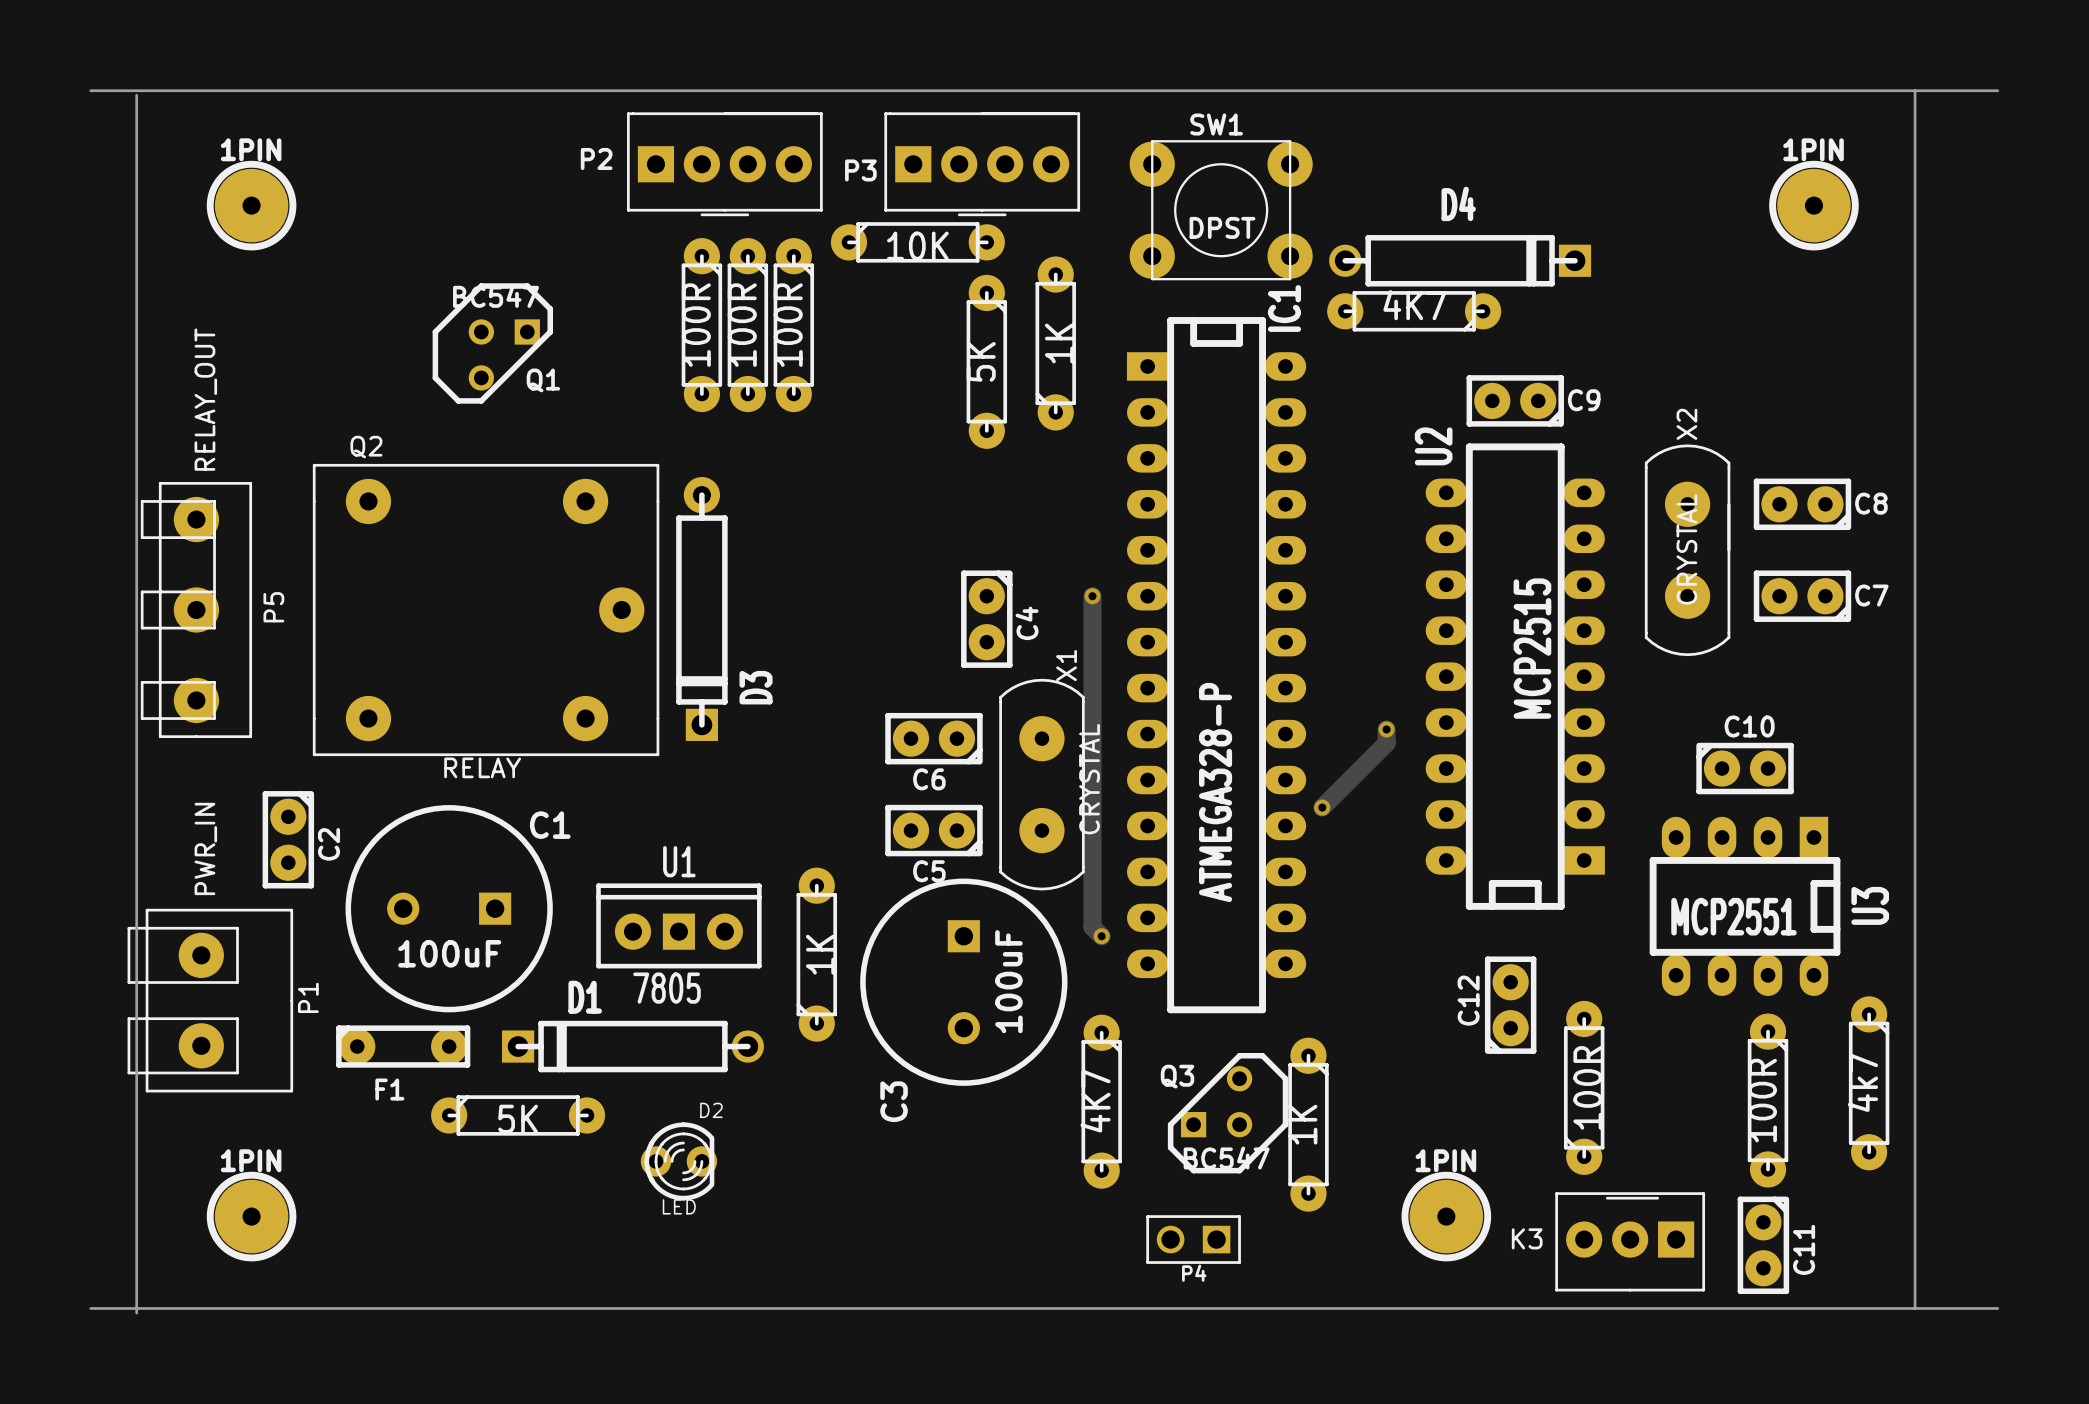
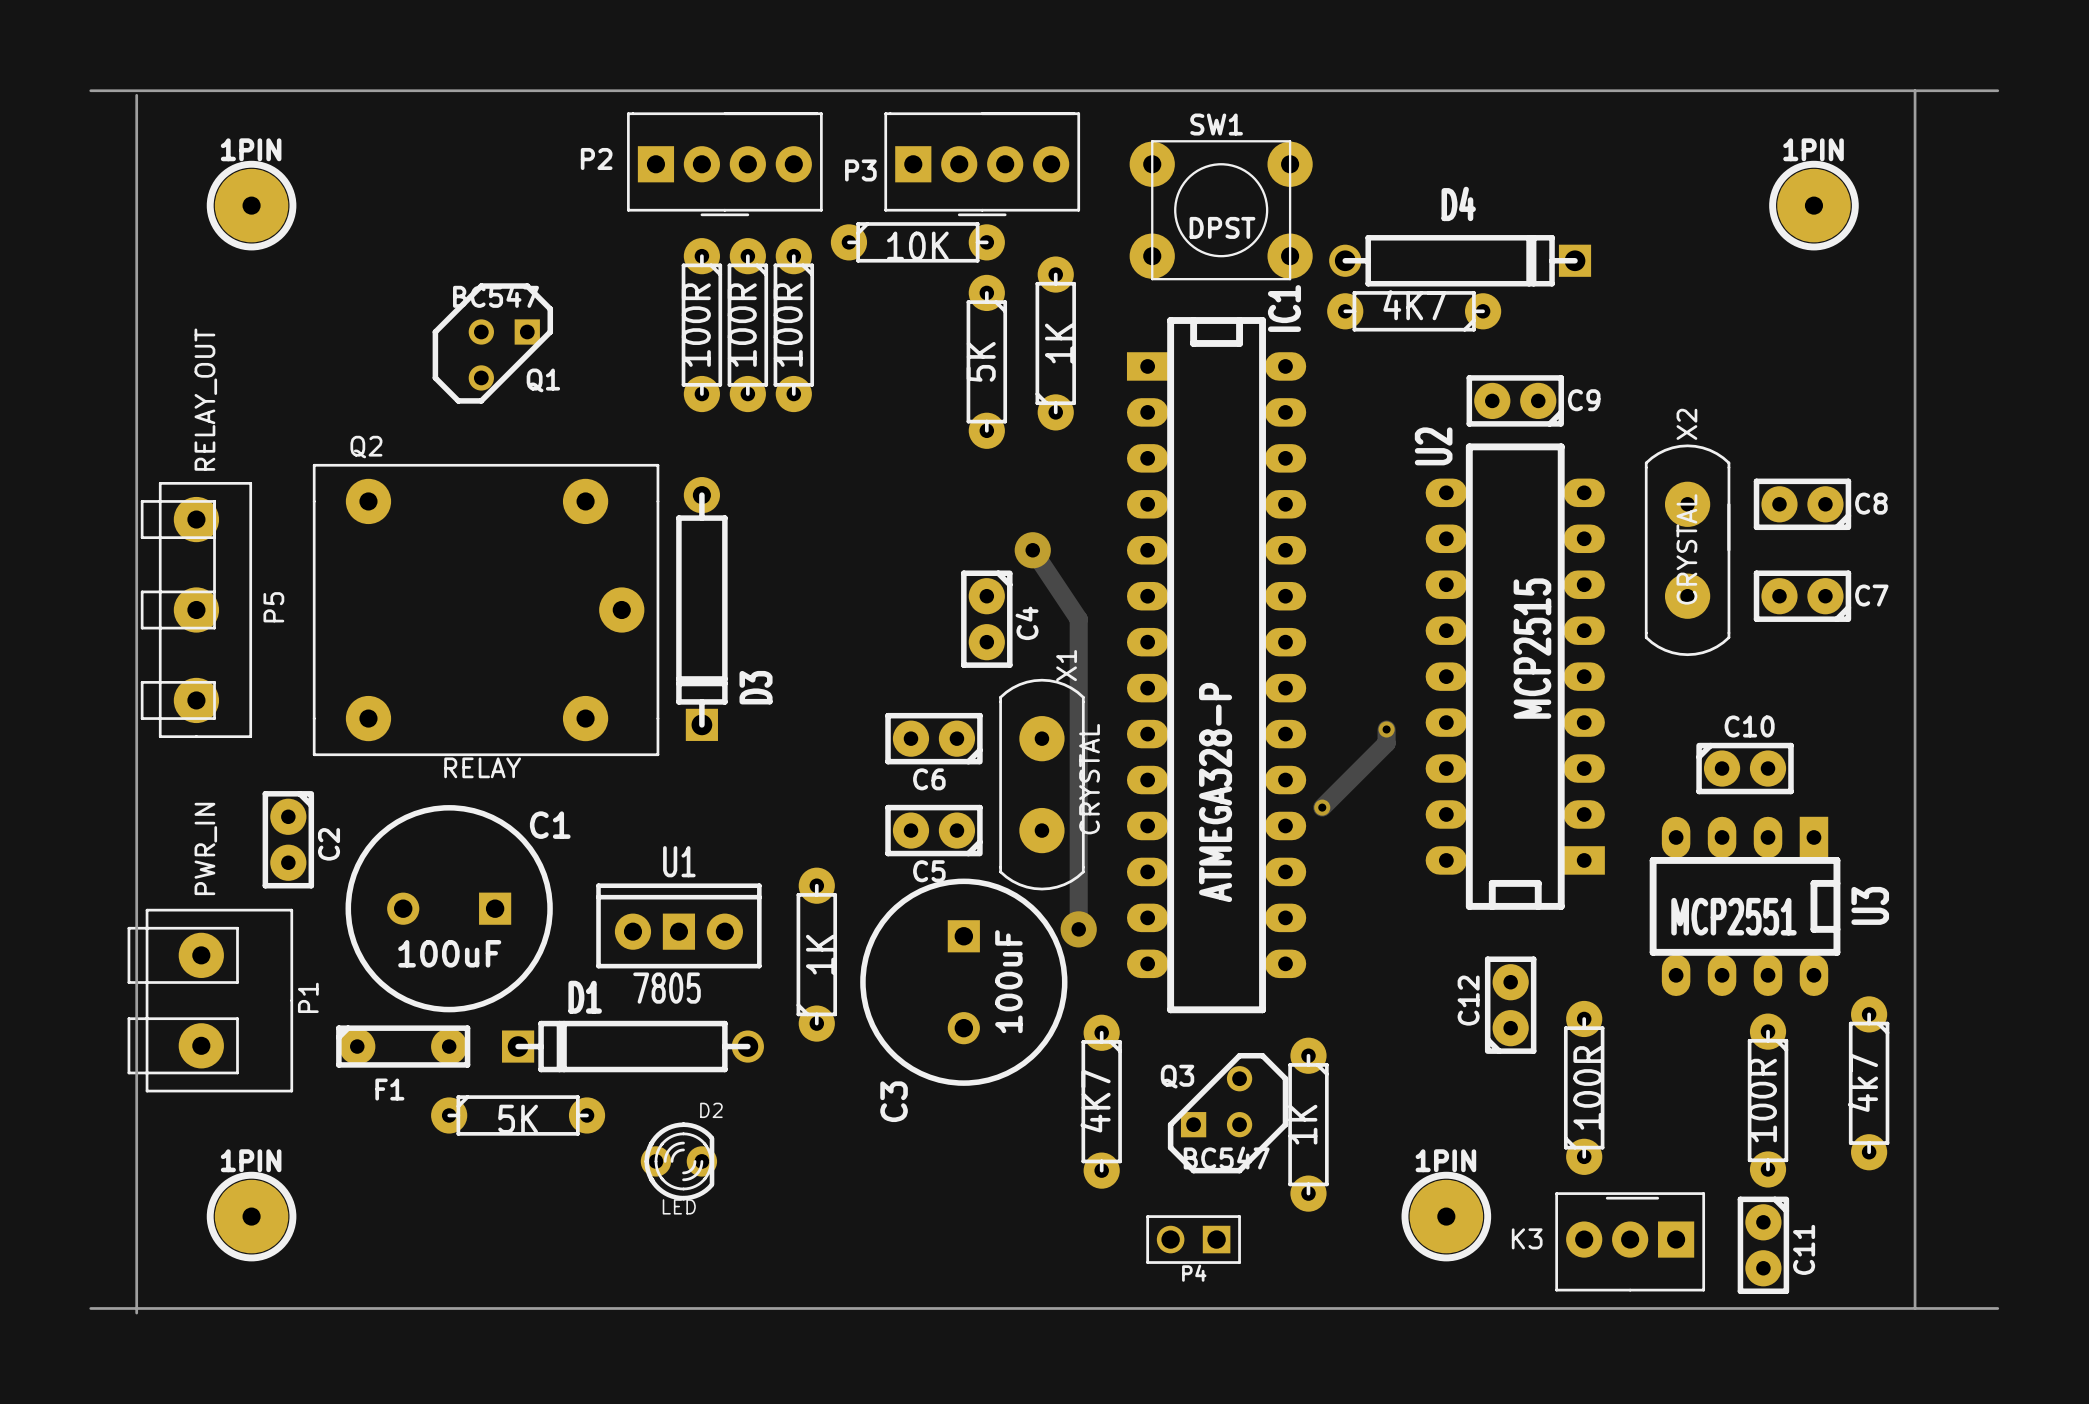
track: none -> (1032, 550) (1078, 619) (1078, 929)
via: none -> (1032, 550)
track: (1092, 596) (1092, 927) (1101, 936) -> none
via: (1092, 596) -> none
via: none -> (1078, 929)
via: (1101, 936) -> none

